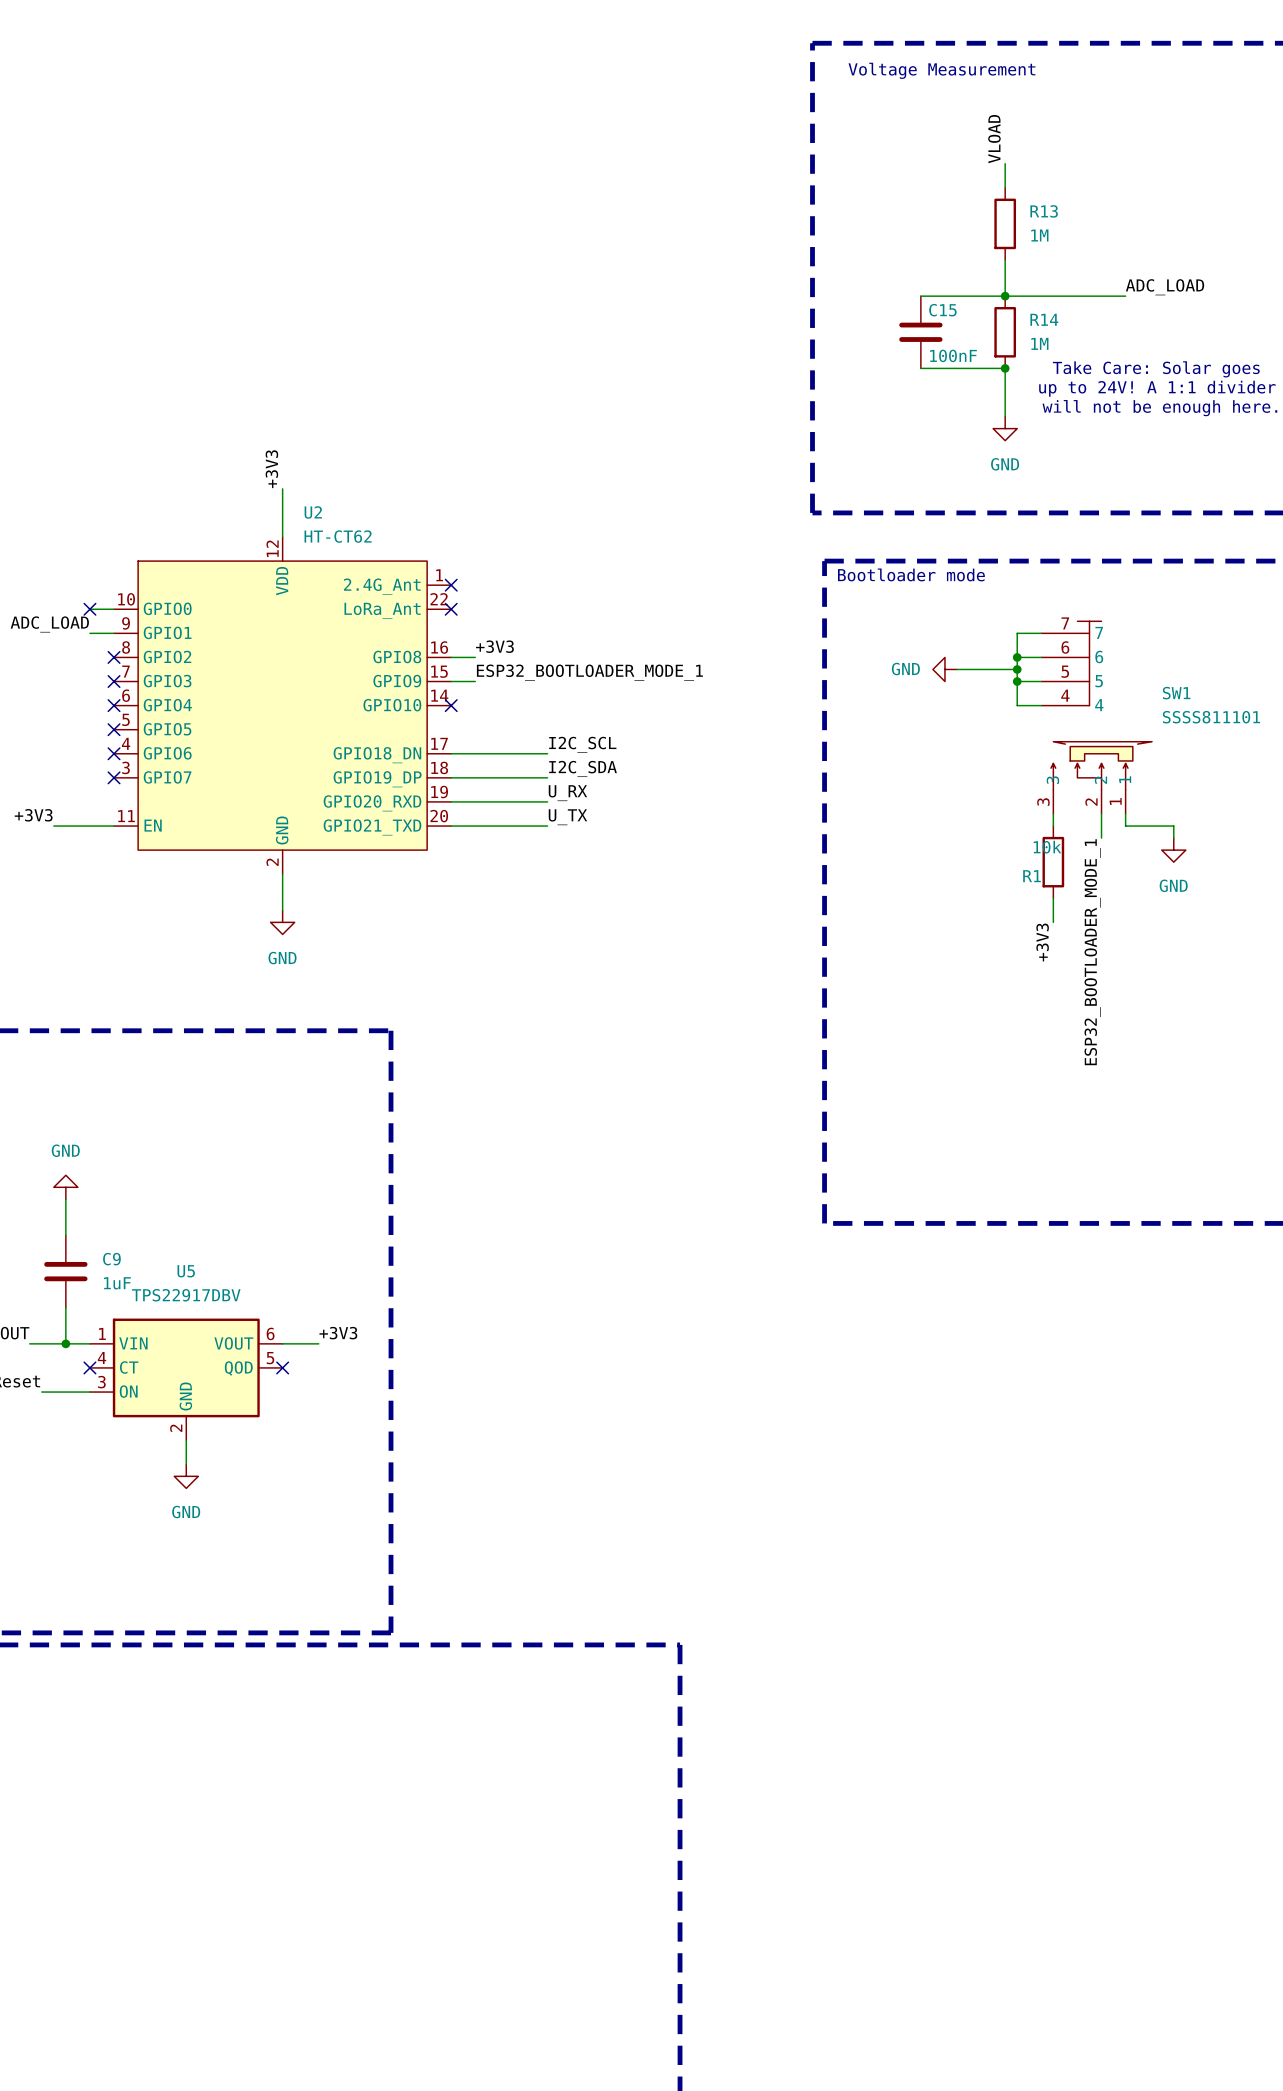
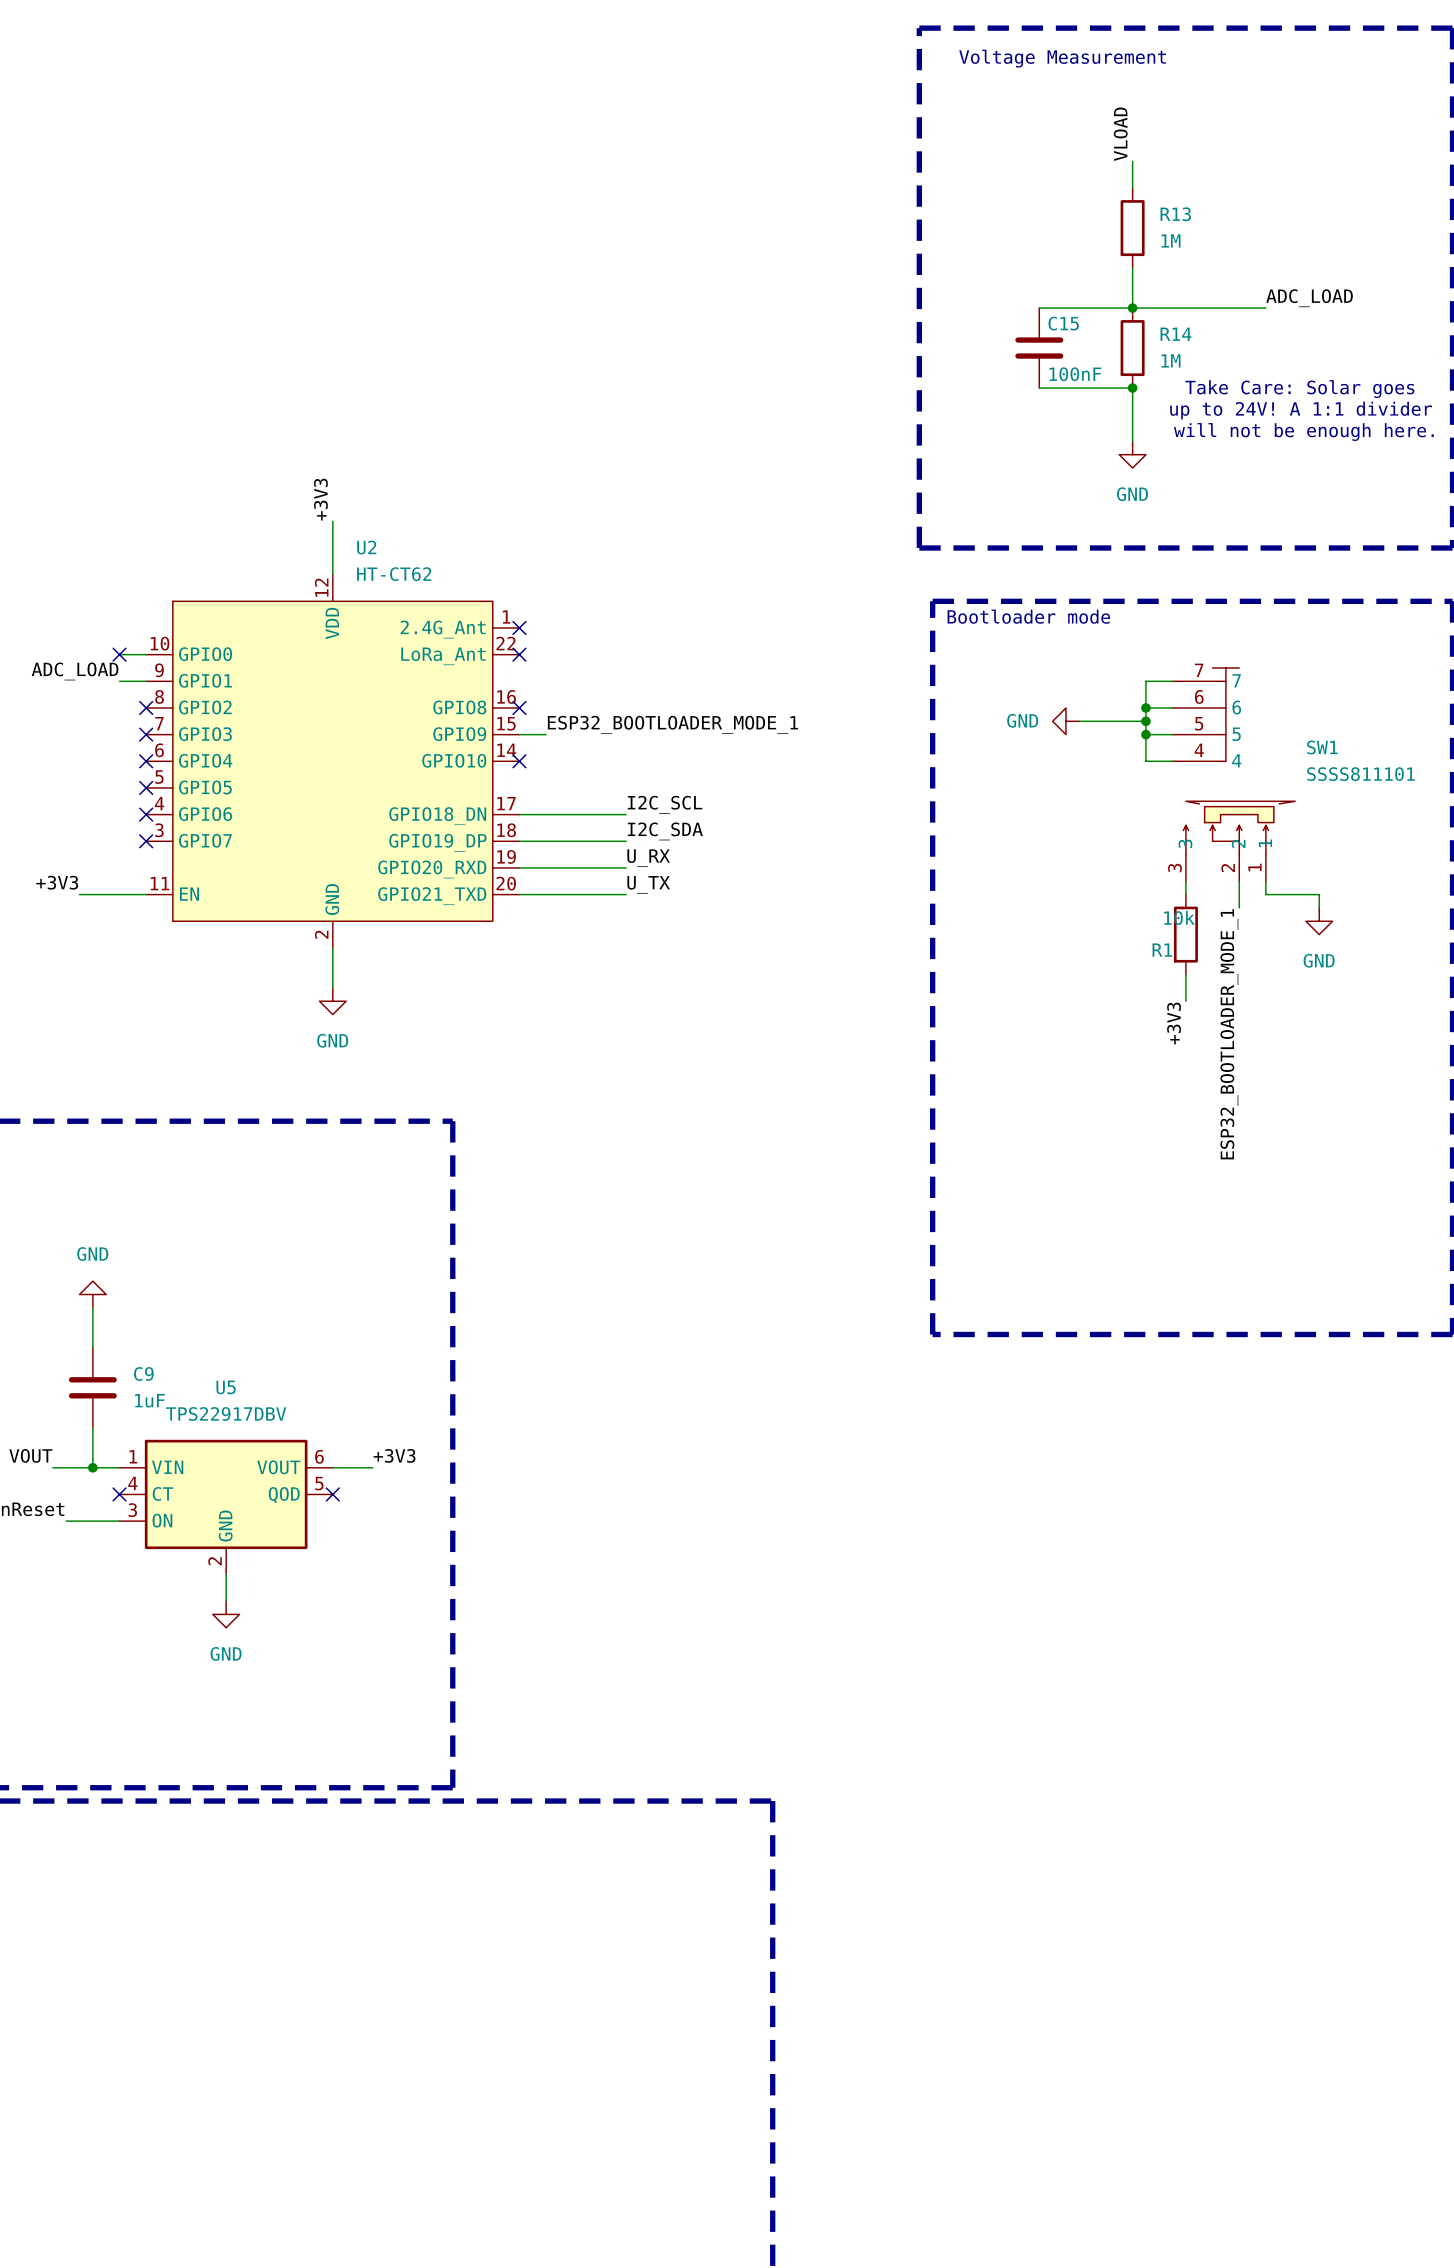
label: +3V3 (494, 646) -> none
wire: (451, 657) (475, 657) -> none
no-connect mark: none -> (519, 707)

